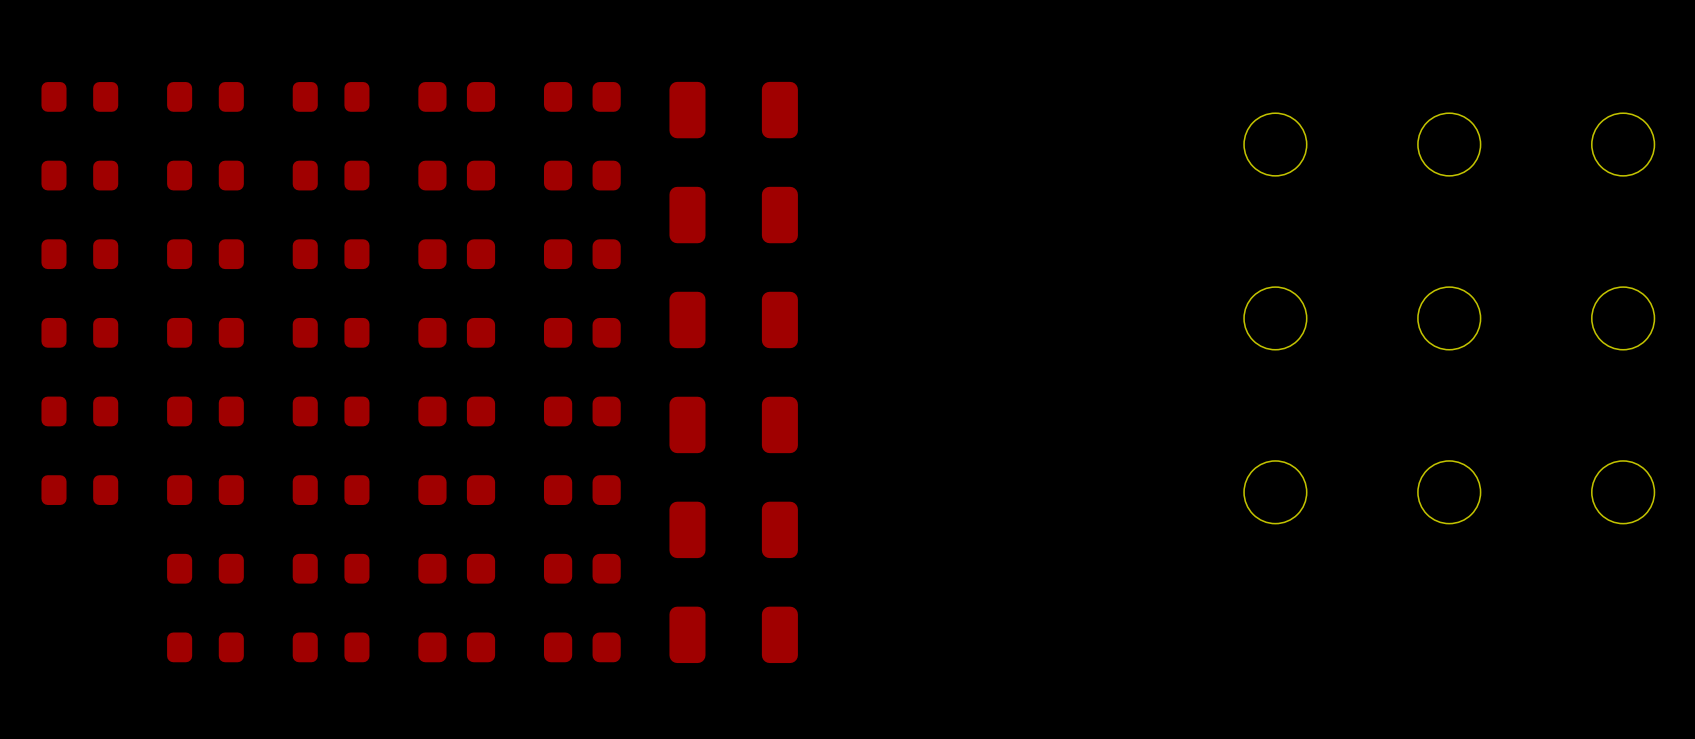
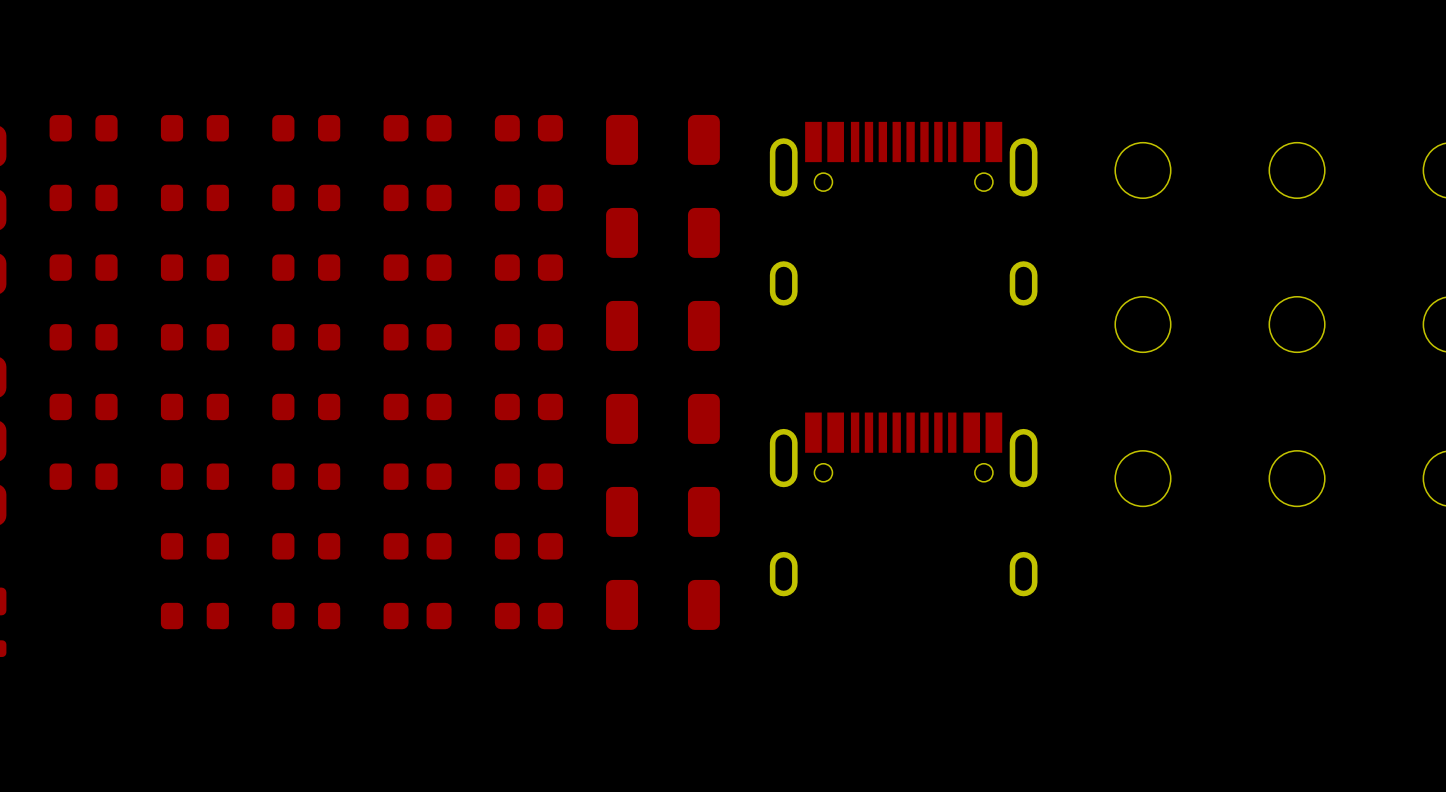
part: none -> (903, 213)
part: none -> (903, 504)

